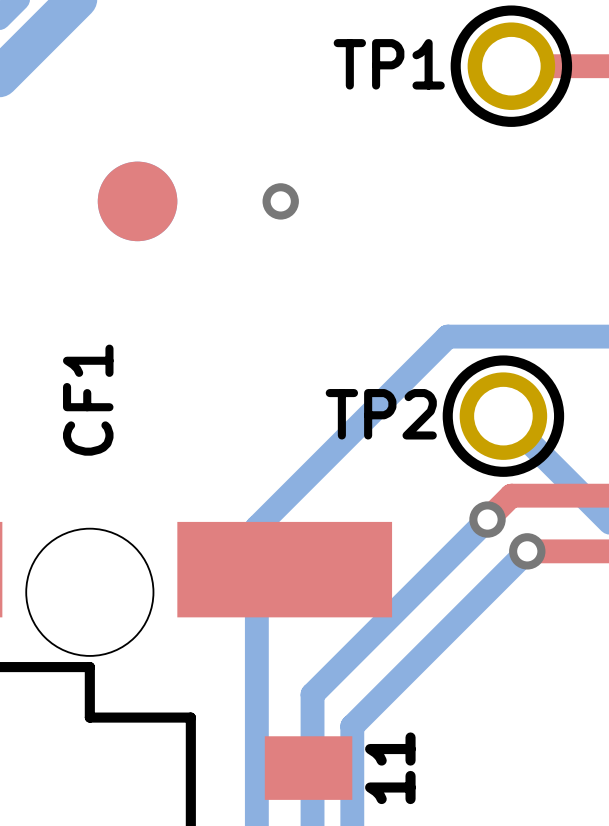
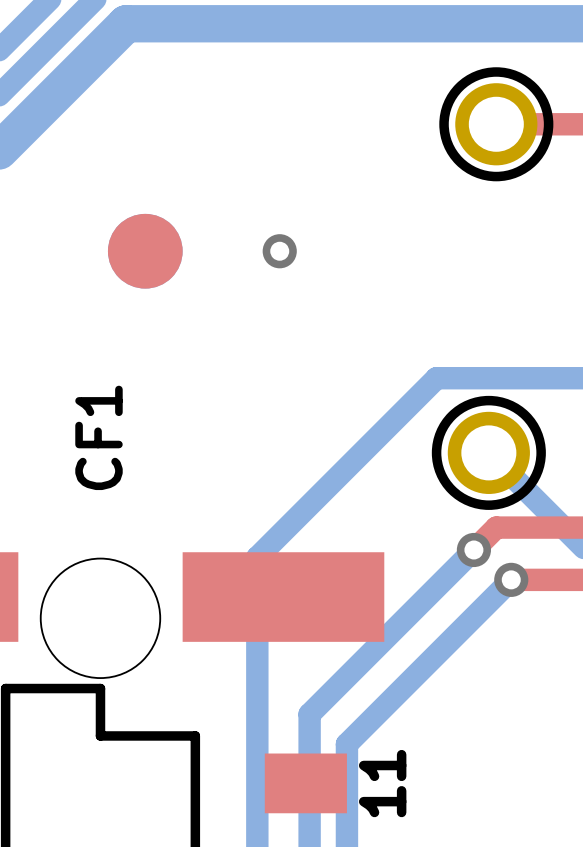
TP1 name: TP1 (389, 64) -> none
TP2 name: TP2 (381, 414) -> none

